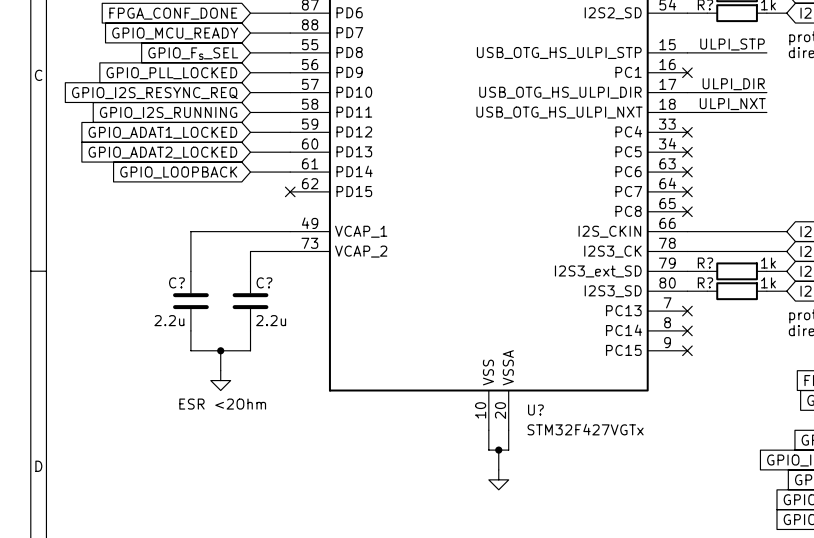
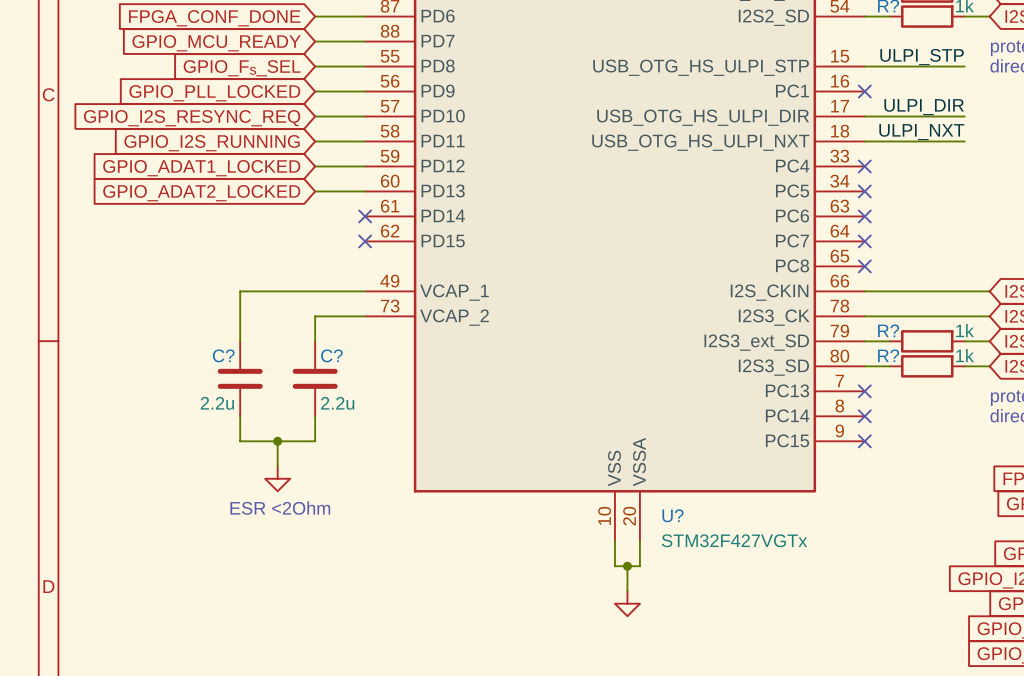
global label: GPIO_LOOPBACK (178, 172) -> none
wire: (250, 172) (290, 172) -> none
no-connect mark: none -> (365, 216)

